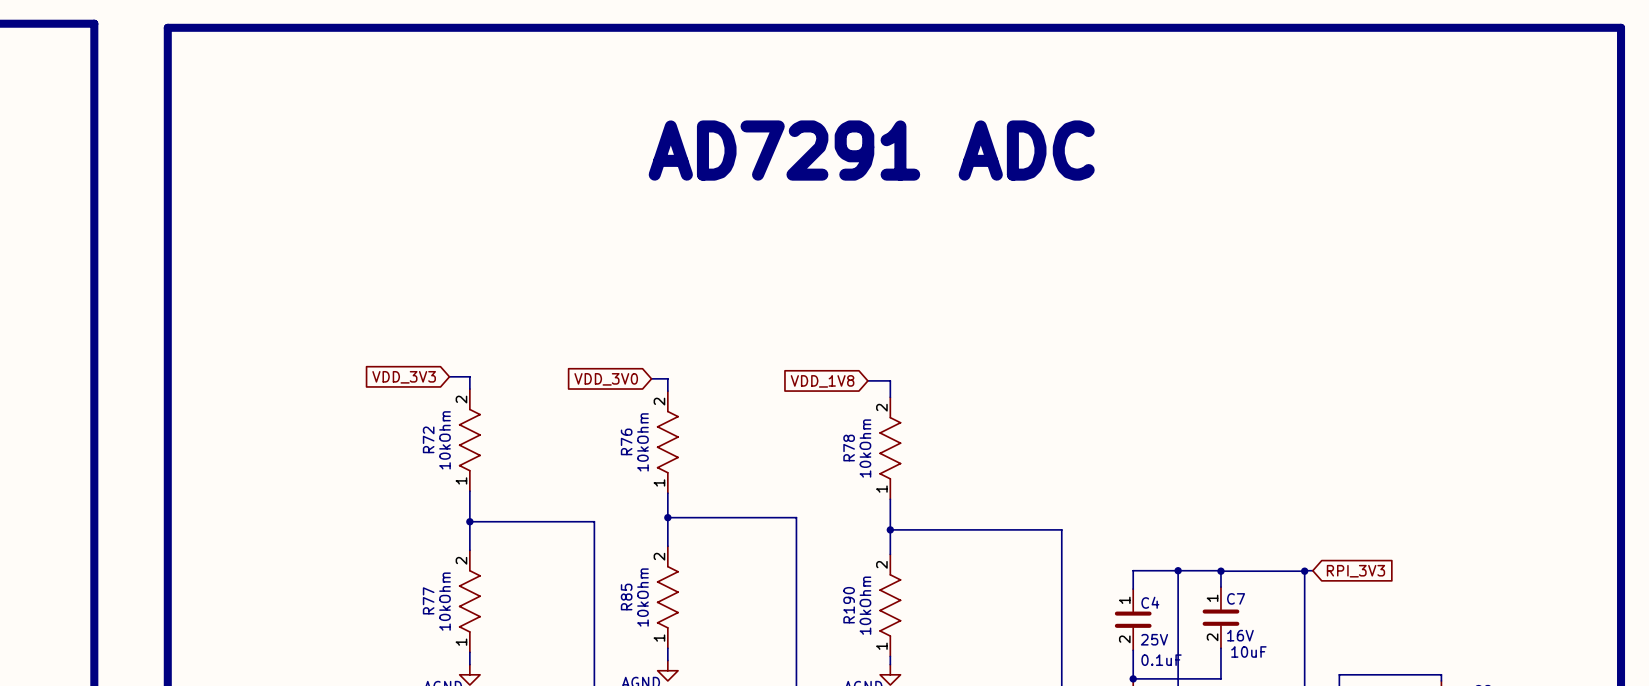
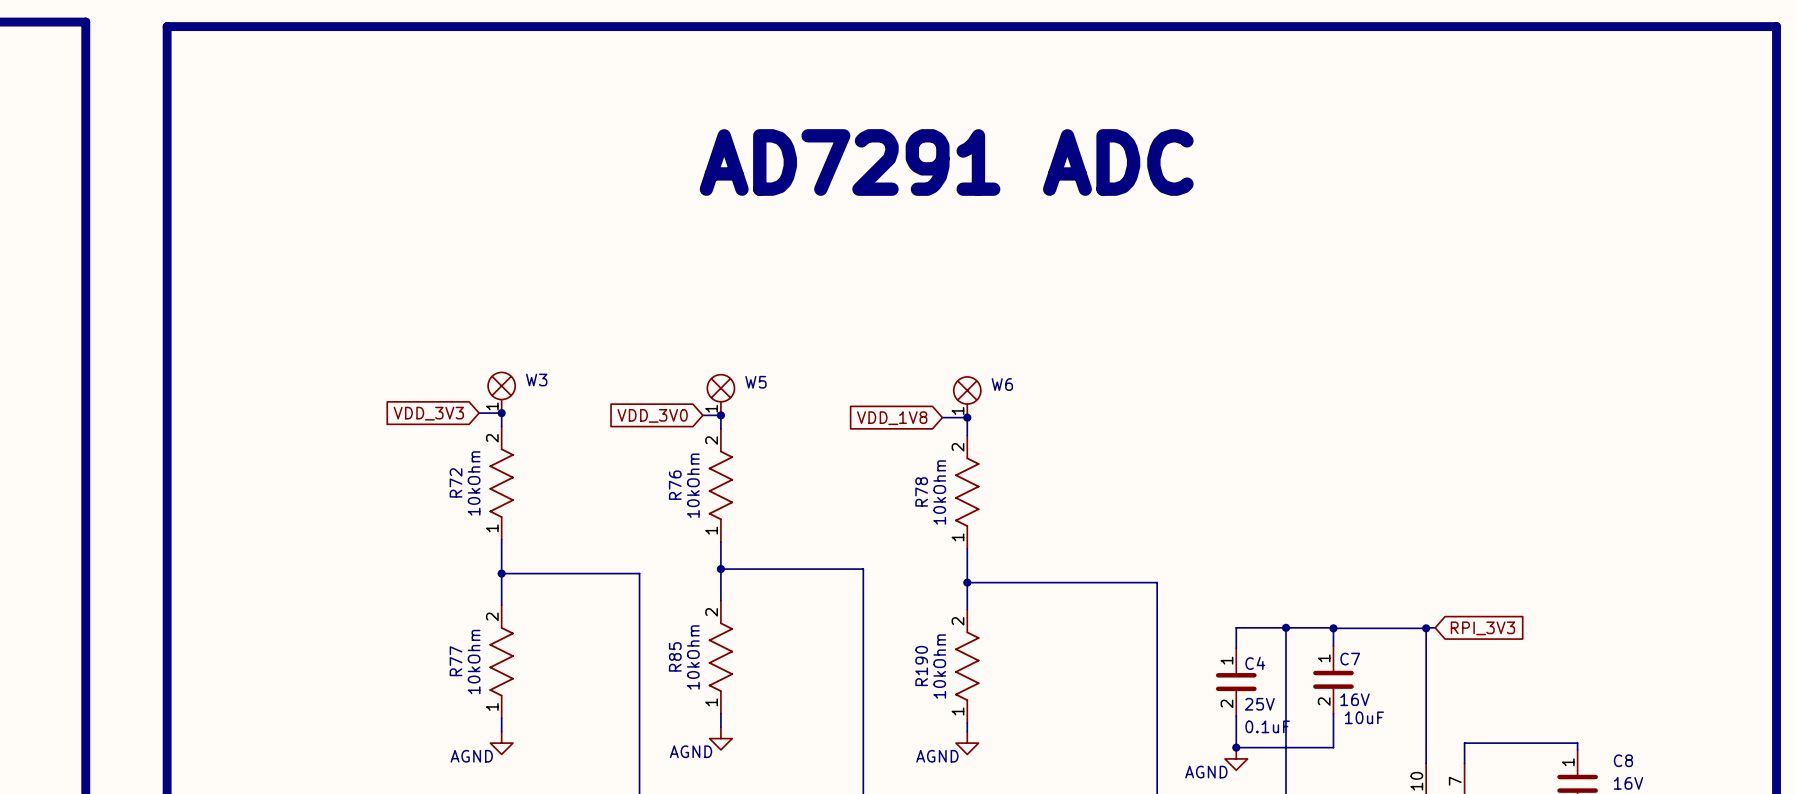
W3: none -> (501, 392)
W5: none -> (720, 395)
W6: none -> (967, 397)
junction: none -> (501, 413)
junction: none -> (720, 415)
junction: none -> (967, 417)

